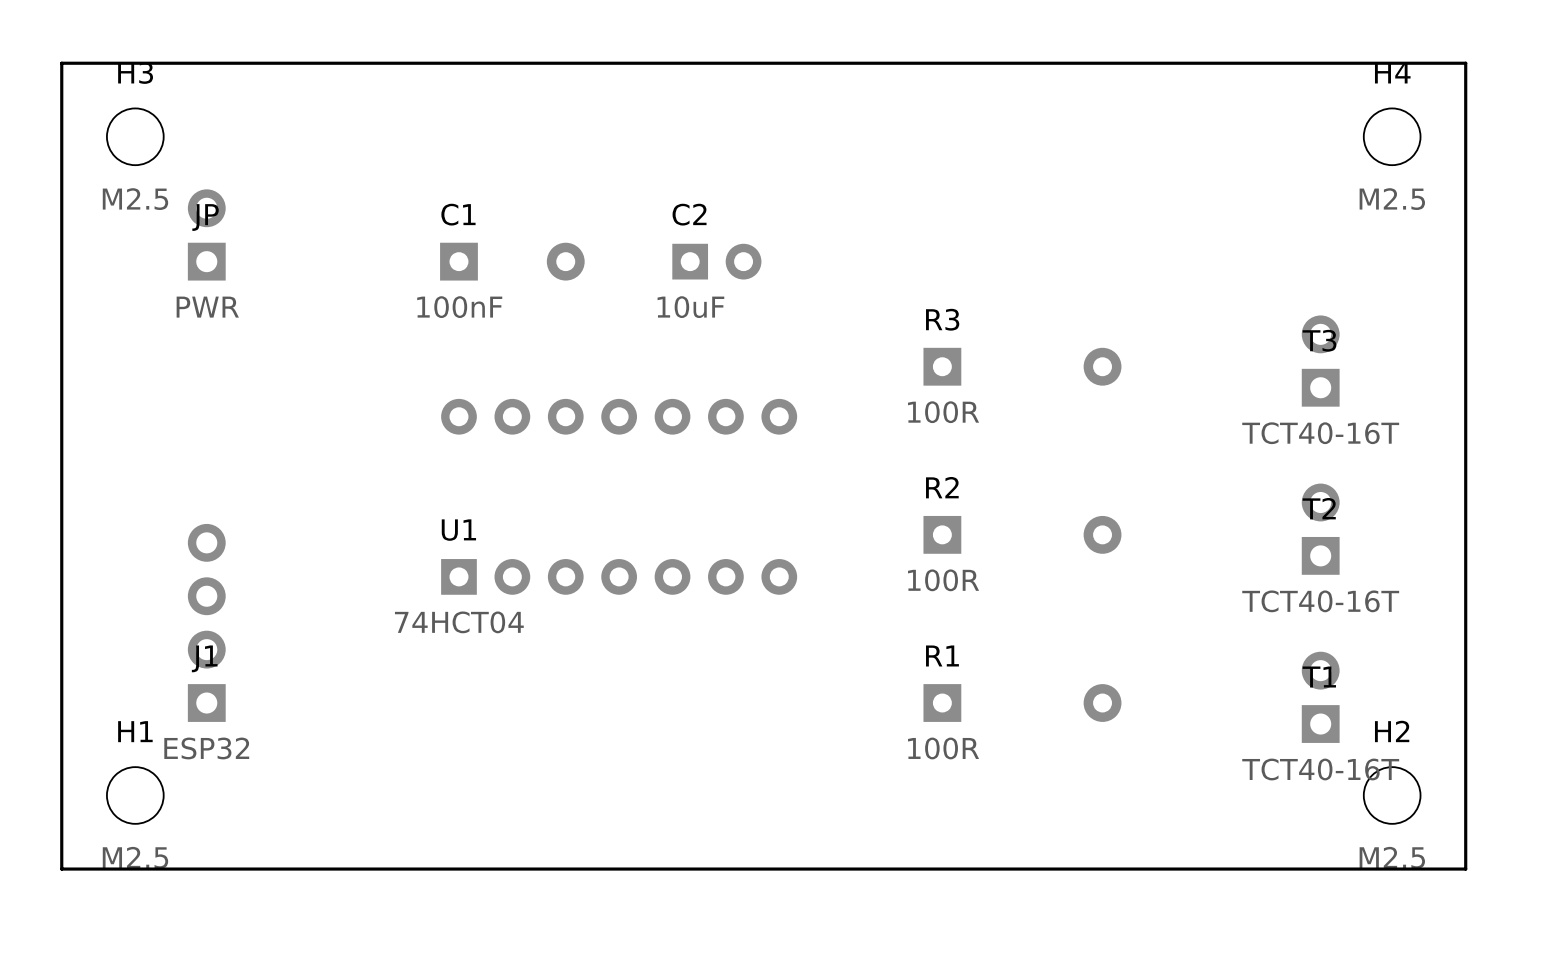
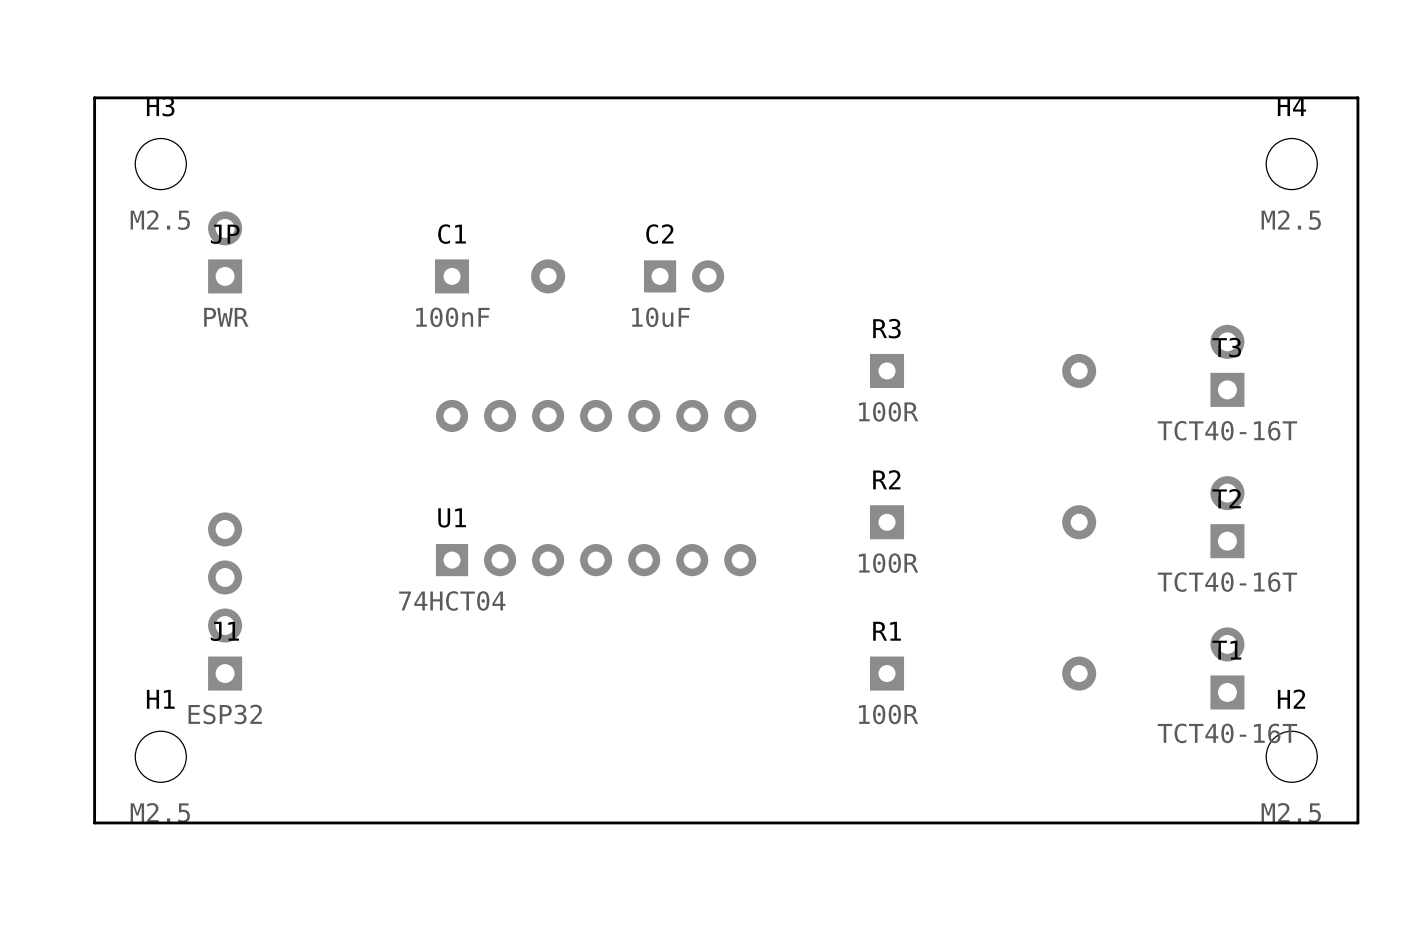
R3 footprint: [923, 347, 1122, 386] -> [869, 353, 1097, 388]
R2 footprint: [923, 515, 1122, 554] -> [869, 505, 1097, 540]
R1 footprint: [923, 684, 1122, 722] -> [869, 656, 1097, 691]

